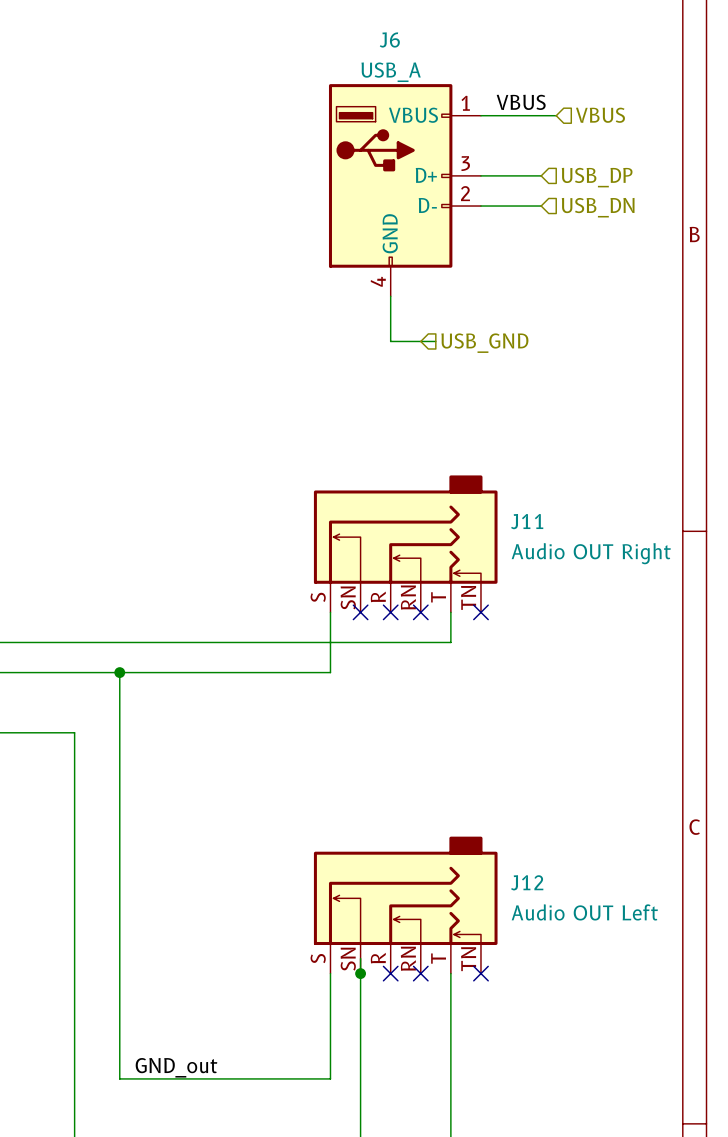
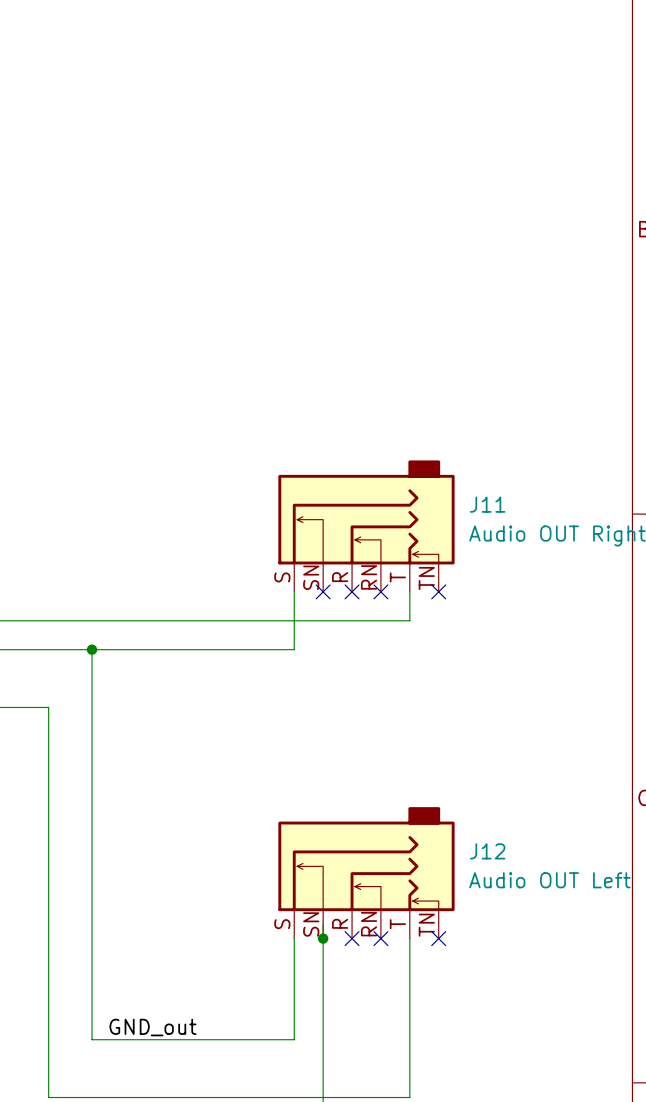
label: VBUS (521, 102) -> none
wire: (480, 115) (556, 115) -> none
hierarchical label: VBUS (600, 115) -> none
wire: (480, 175) (541, 175) -> none
hierarchical label: USB_DP (597, 177) -> none
J6: USB_A (404, 190) -> none
wire: (480, 206) (541, 206) -> none
hierarchical label: USB_DN (598, 207) -> none
wire: (390, 296) (390, 341) (435, 341) -> none
hierarchical label: USB_GND (484, 343) -> none

